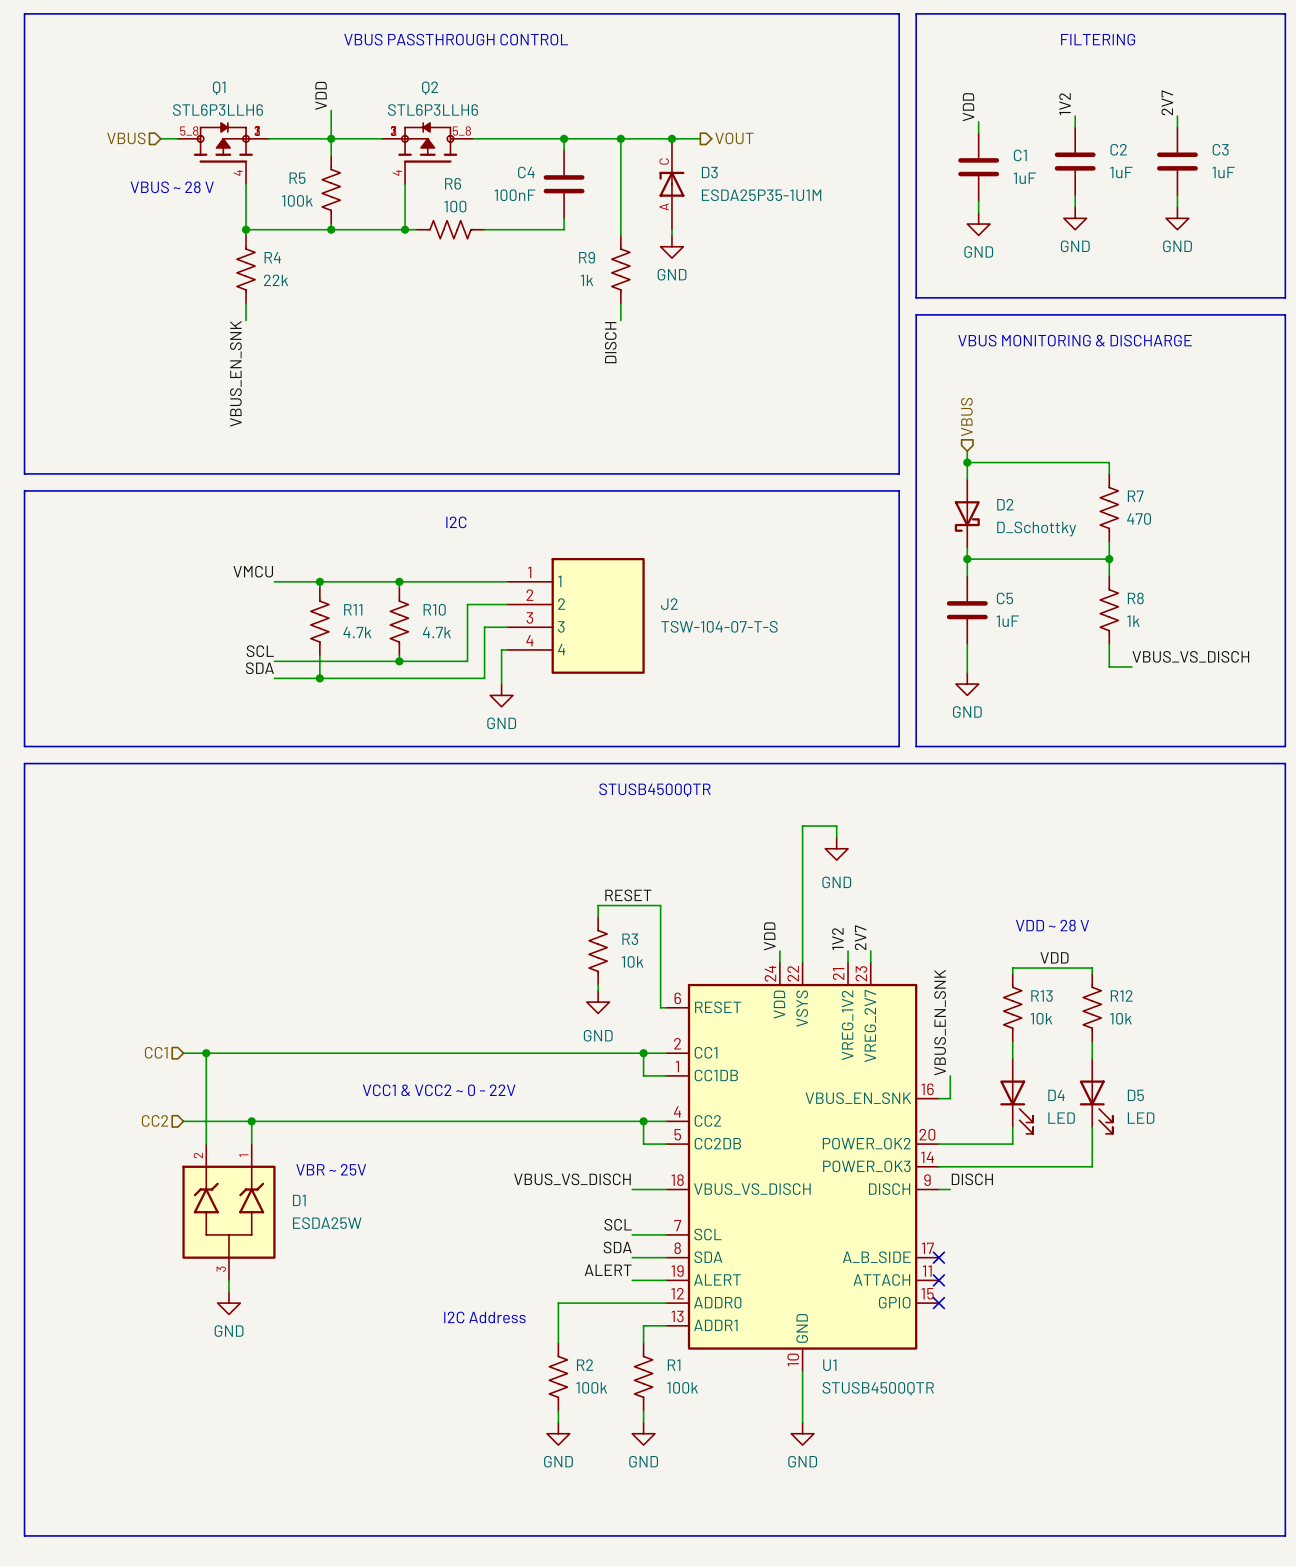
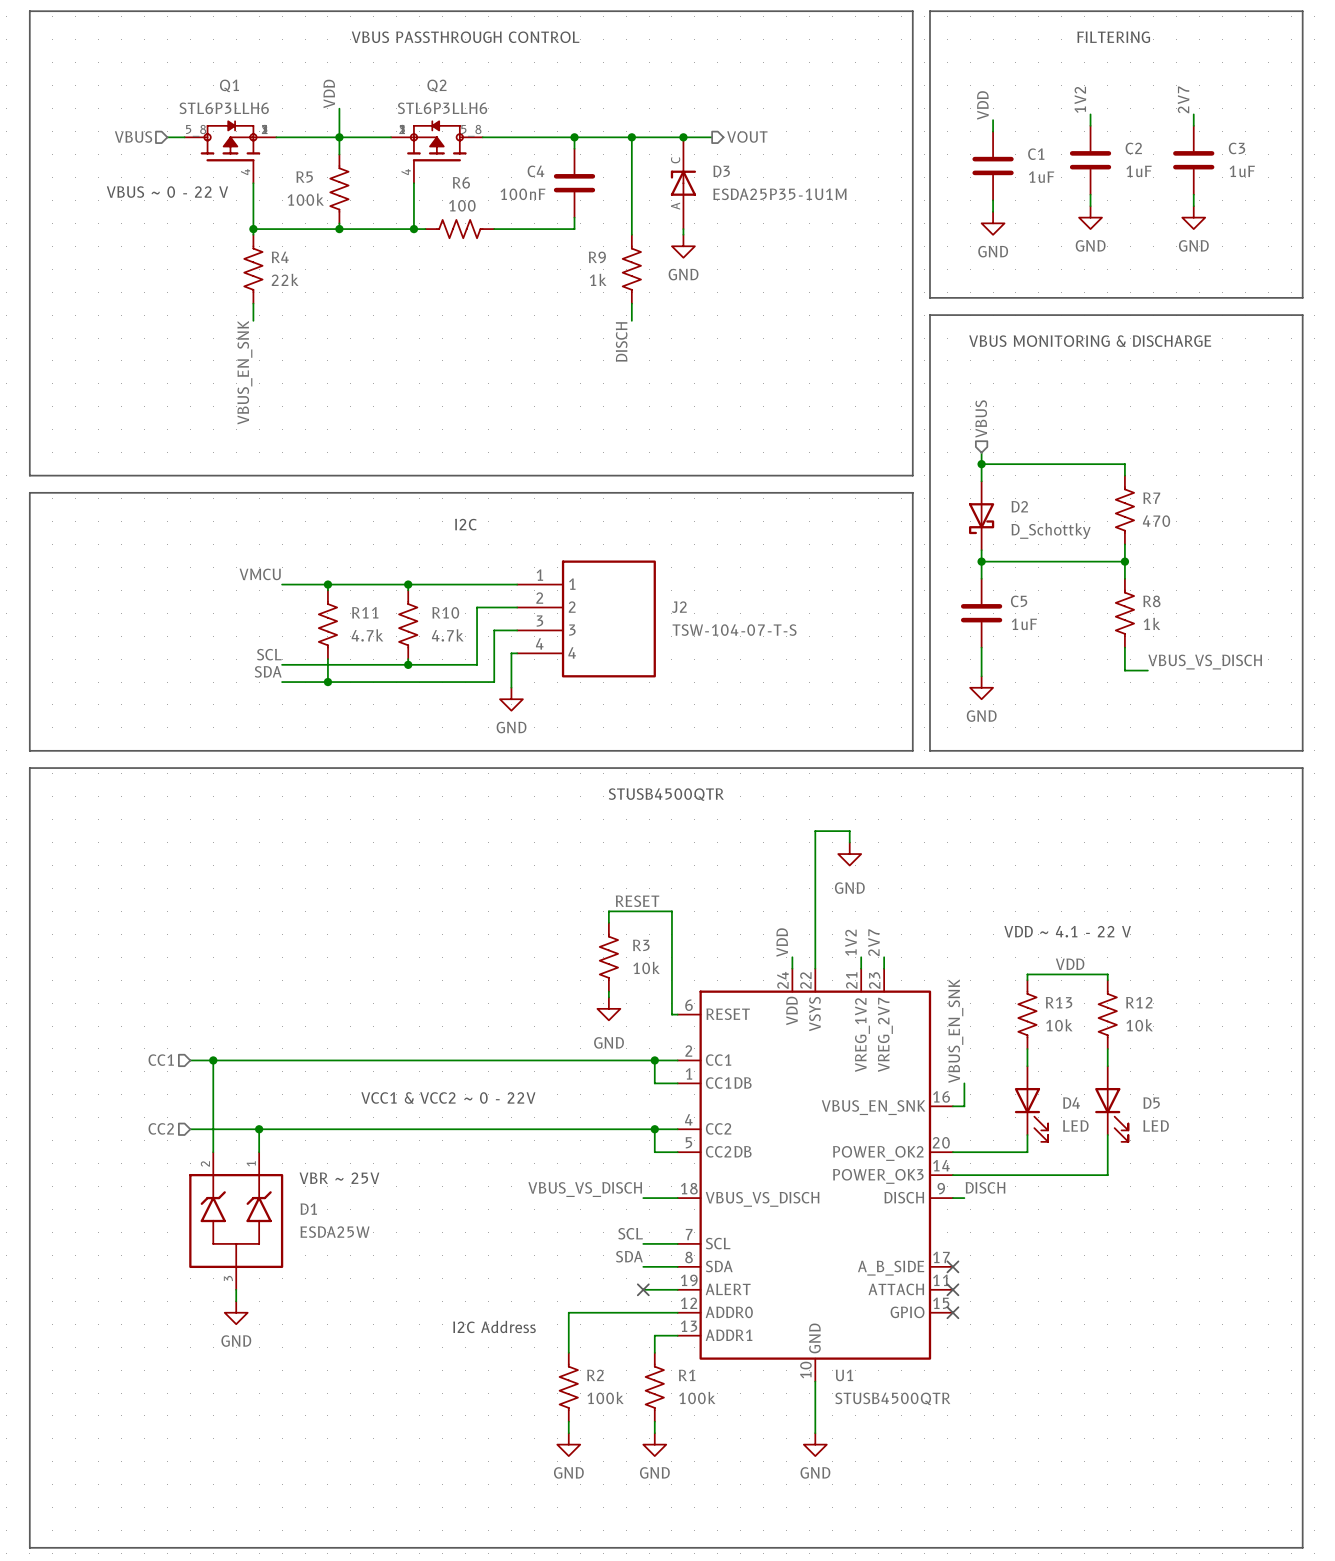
text: VBUS ~ 28 V (172, 187) -> VBUS ~ 0 - 22 V (167, 192)
text: VDD ~ 28 V (1052, 925) -> VDD ~ 4.1 - 22 V (1067, 931)
label: ALERT (608, 1270) -> none
no-connect mark: none -> (643, 1289)

